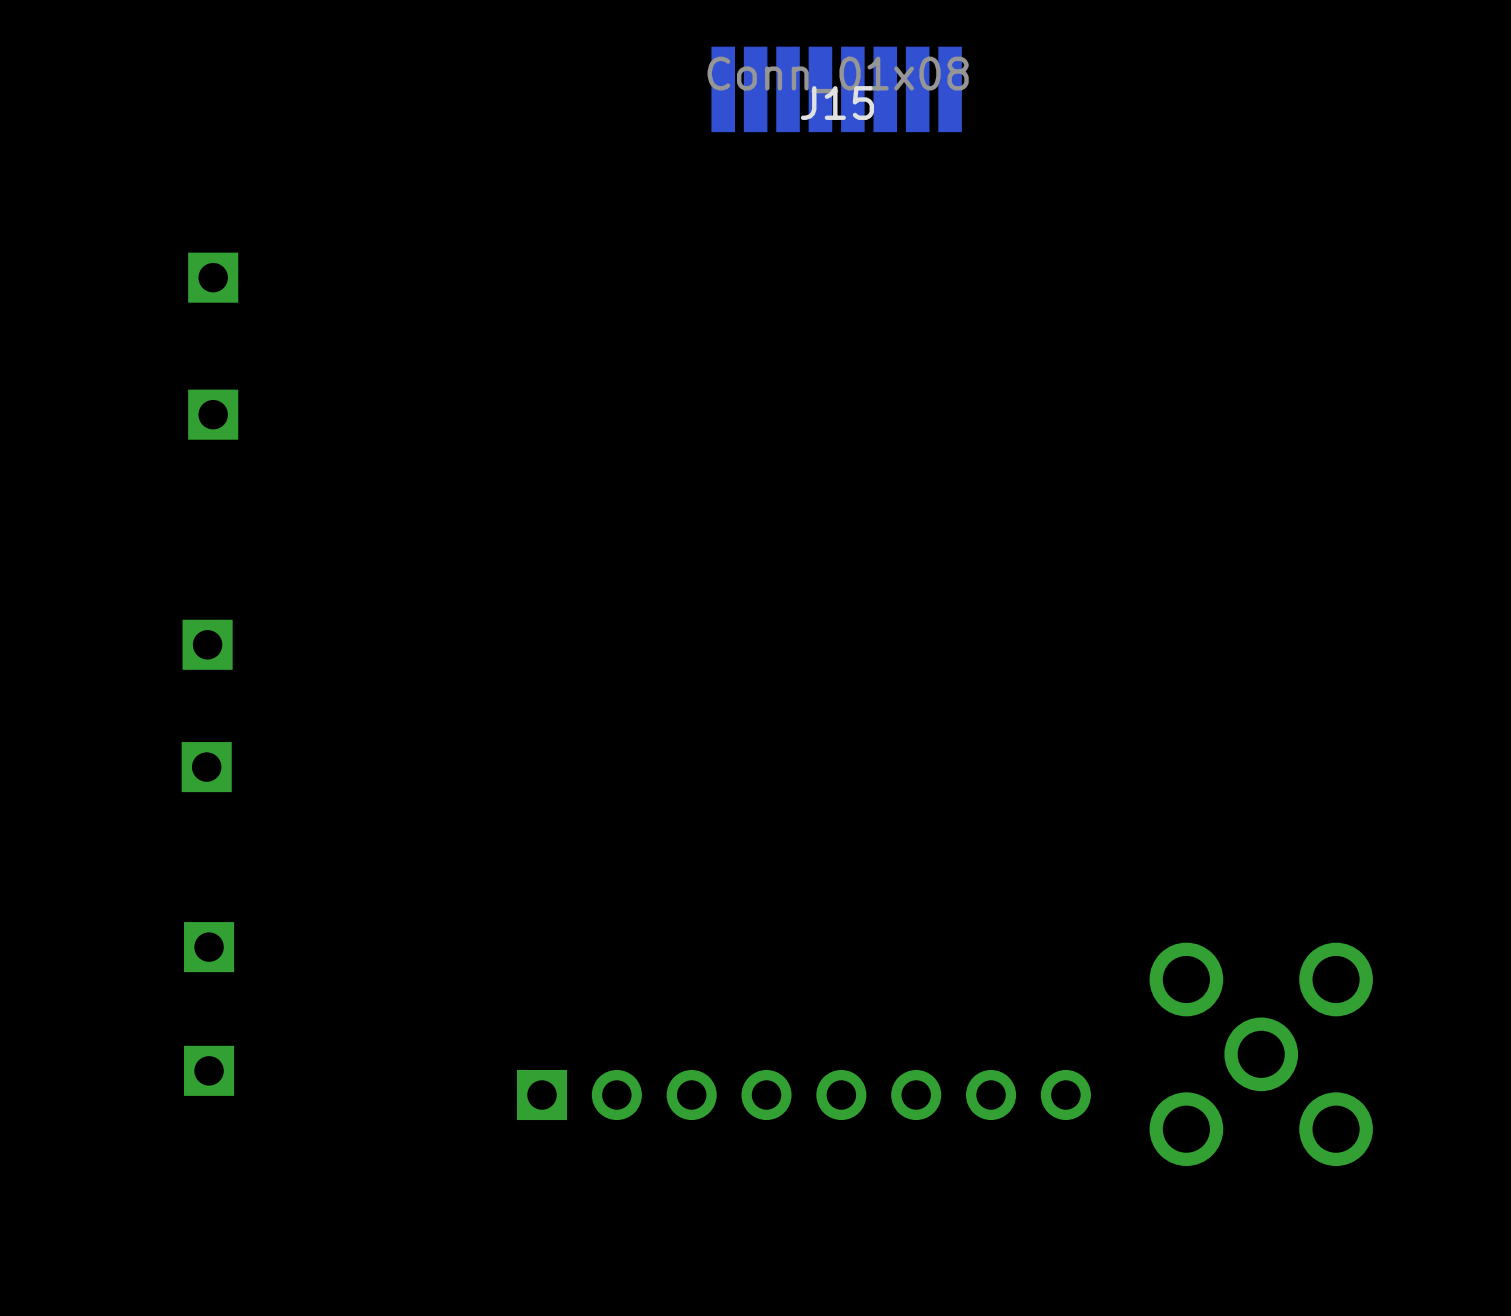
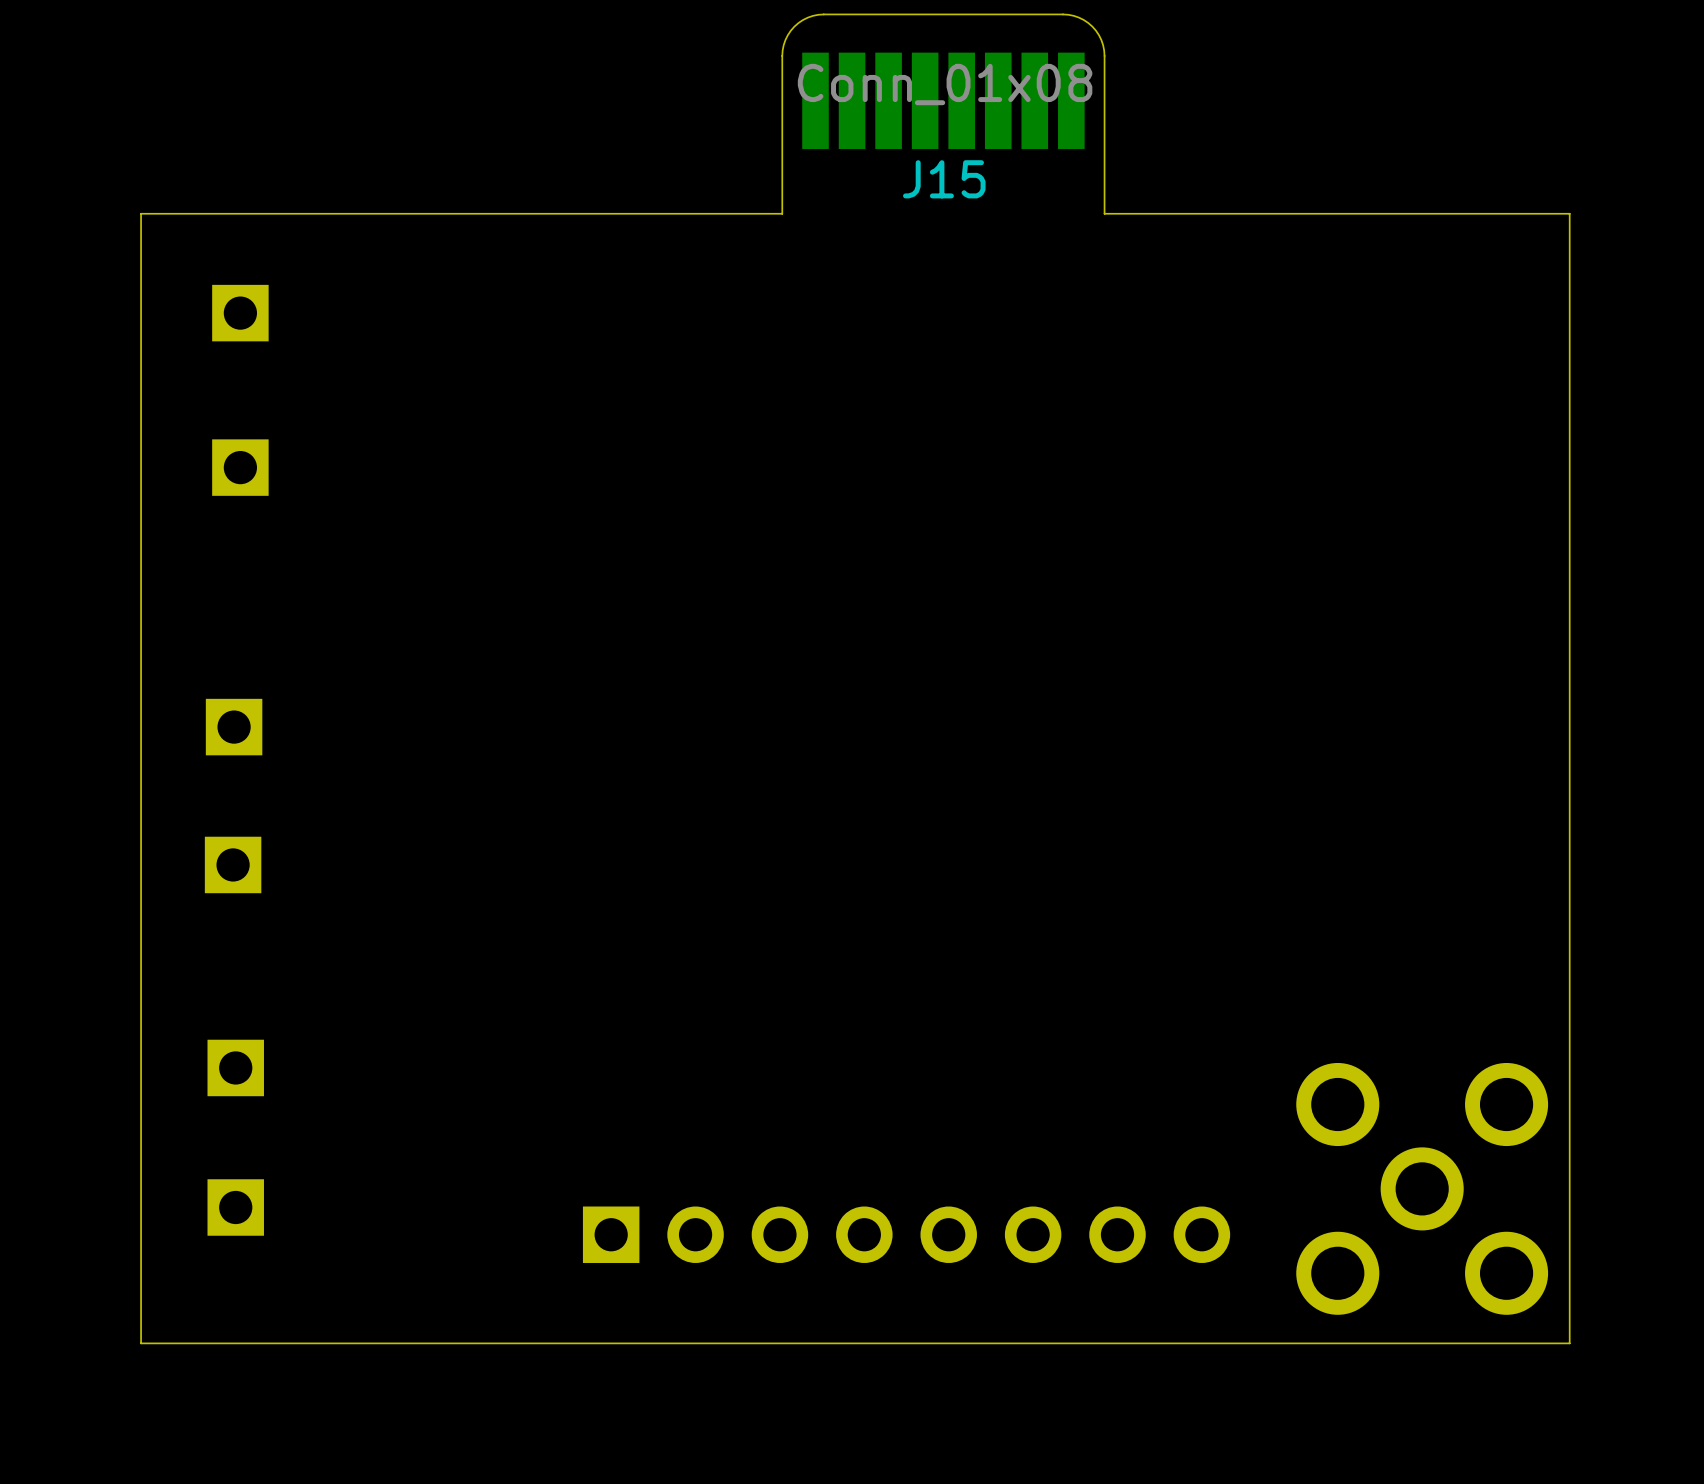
board edge: none -> (1063, 14) (823, 14) (807, 17) (798, 23) (787, 35) (782, 50) (782, 213) (141, 213) (141, 1343) (1569, 1343) (1569, 213) (1104, 213) (1103, 45) (1098, 35) (1088, 23) (1078, 17) (1063, 14)
J15 name position: J15 (837, 103) -> J15 (944, 179)

